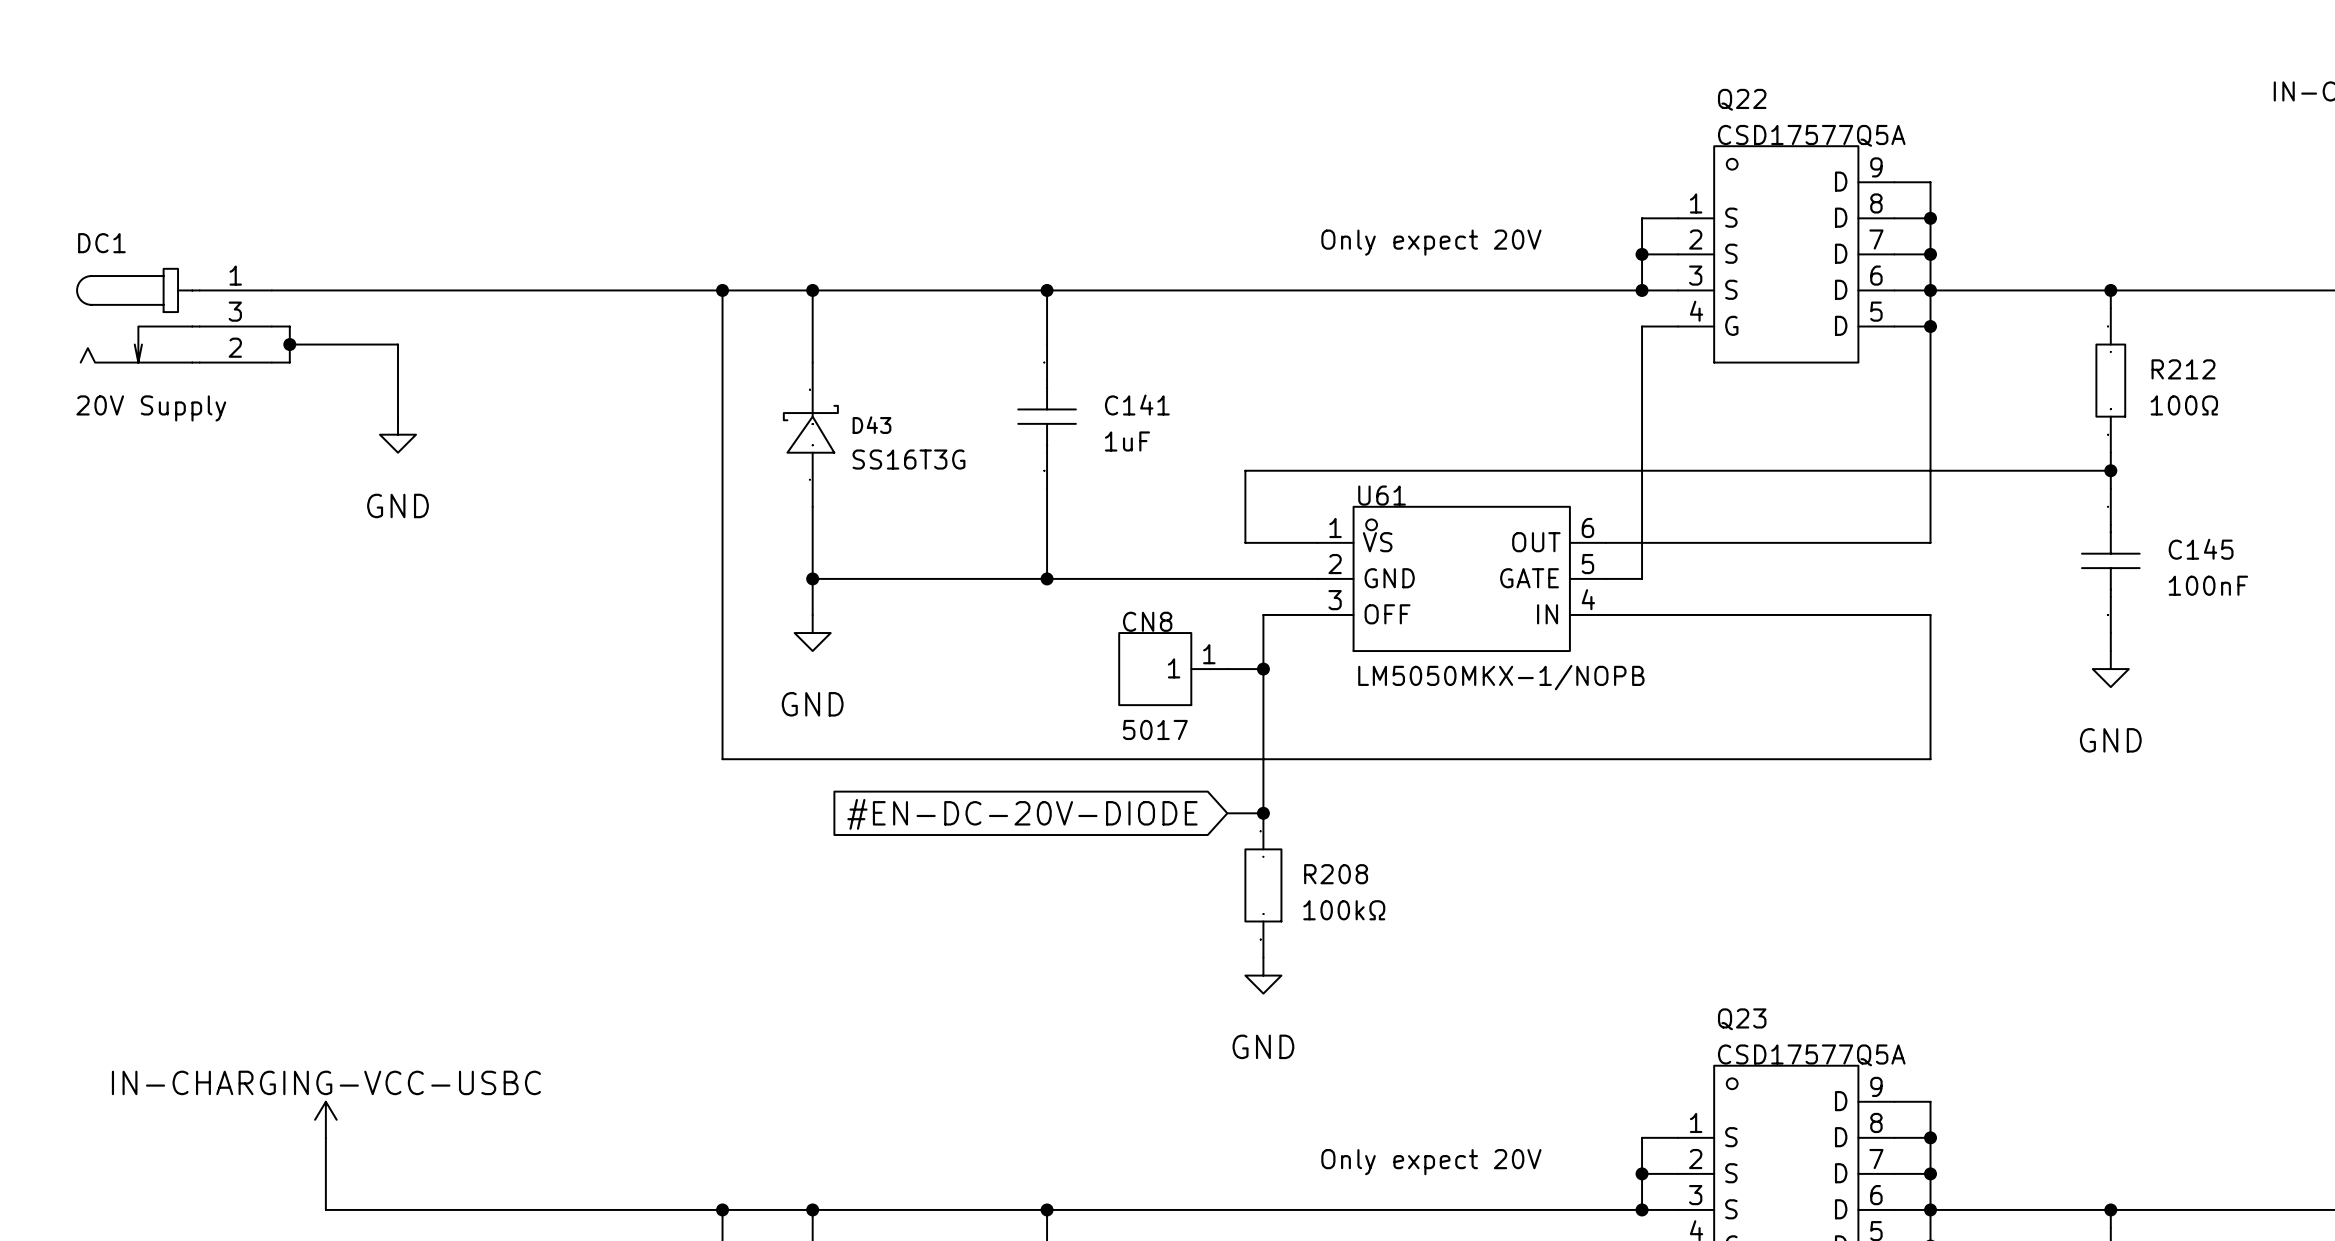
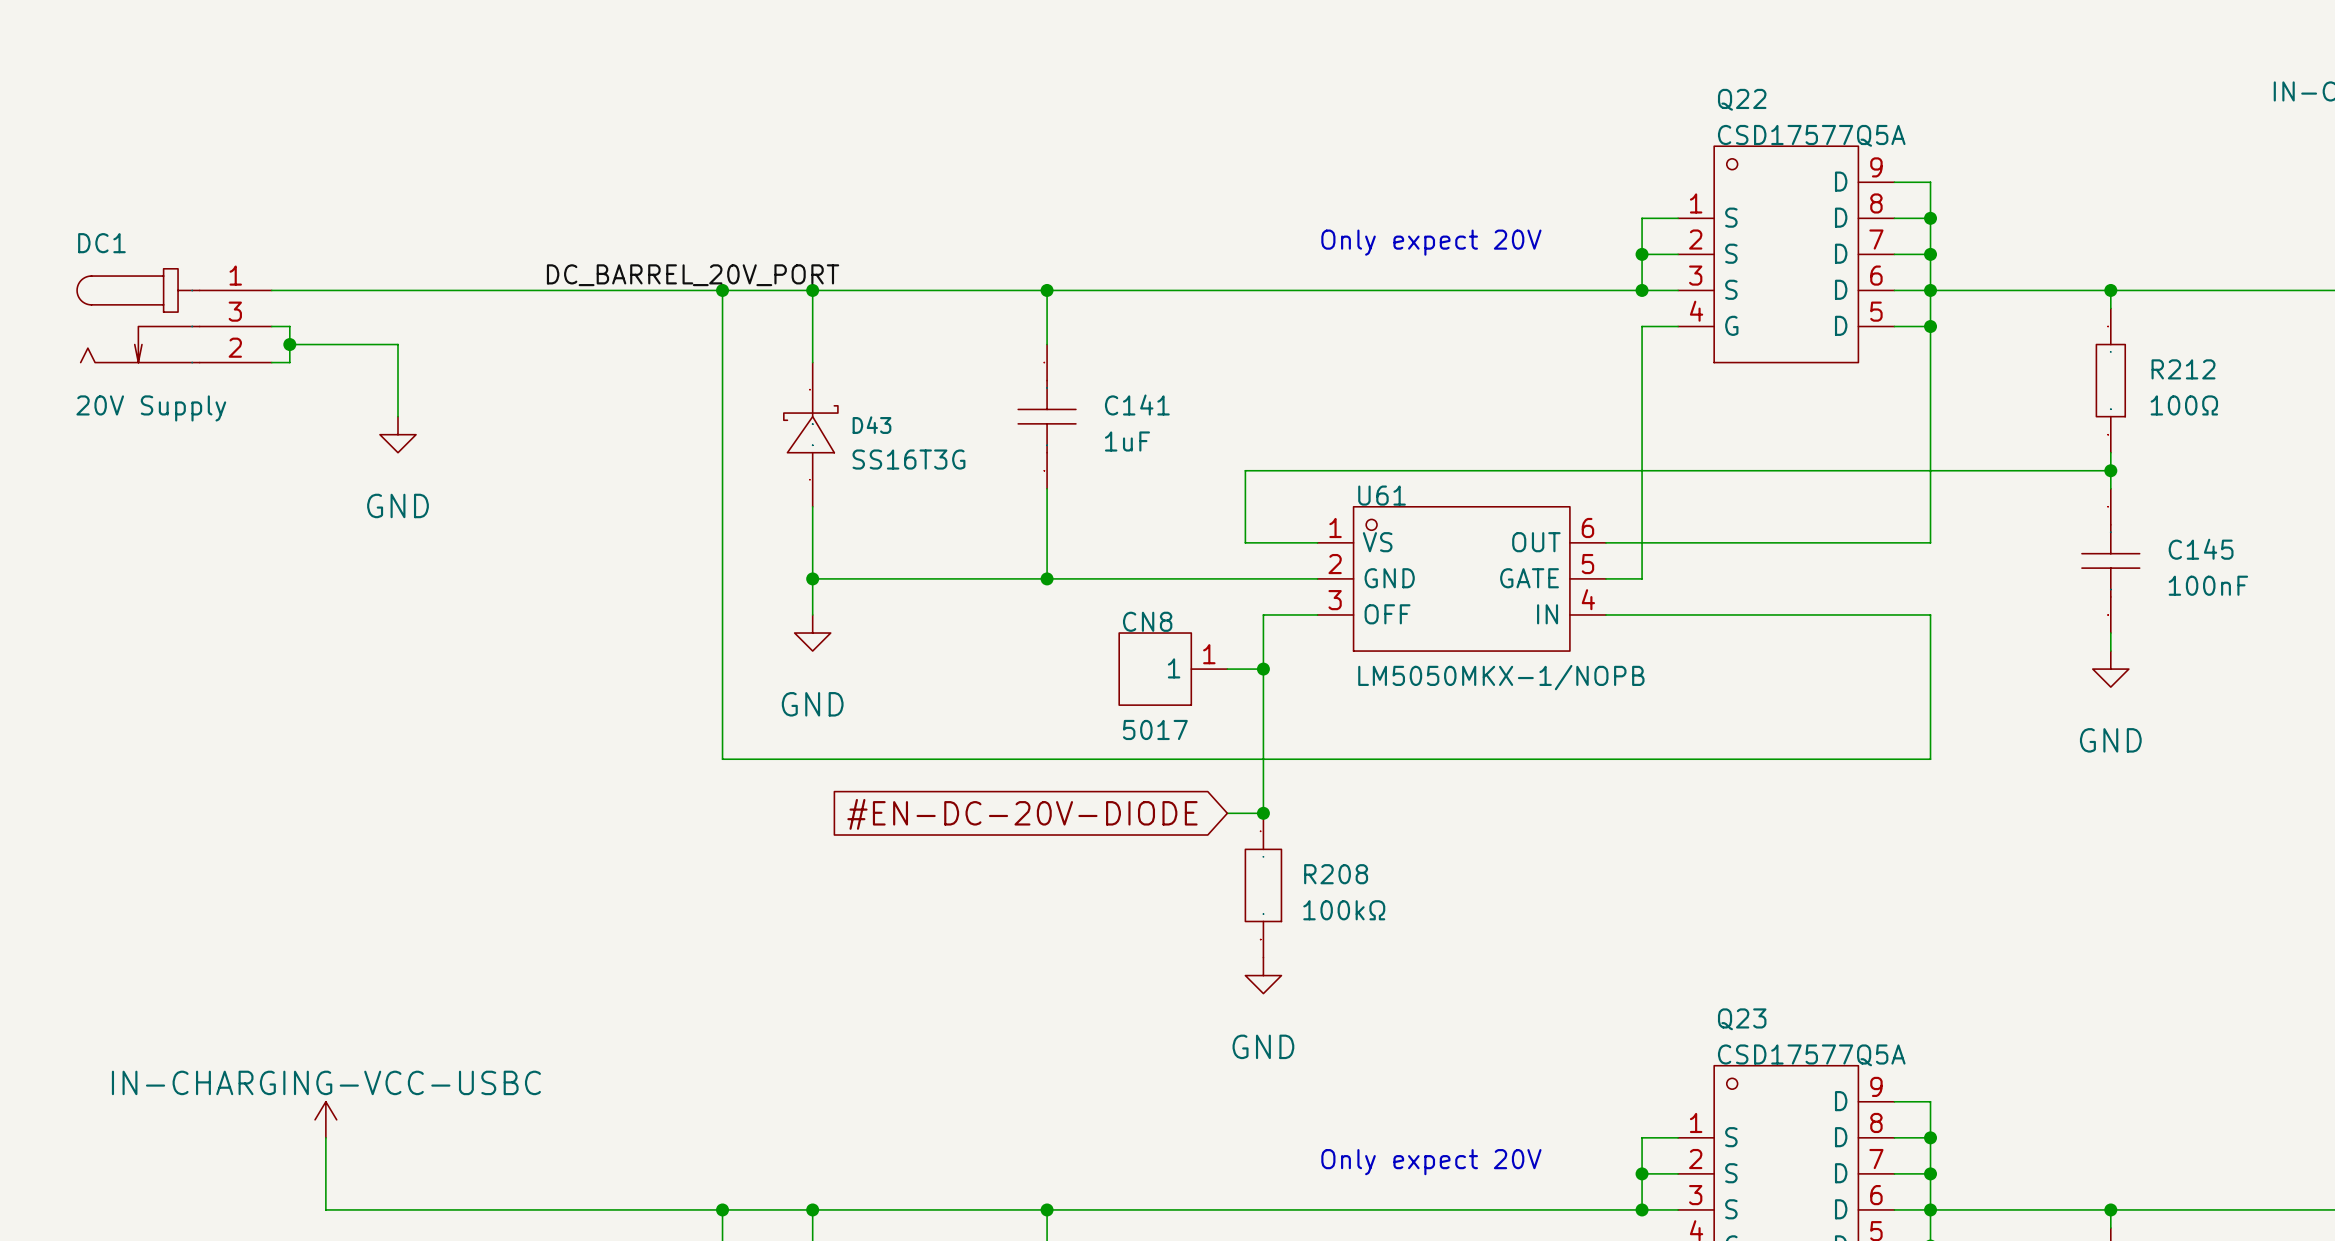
label: none -> DC_BARREL_20V_PORT (693, 275)

